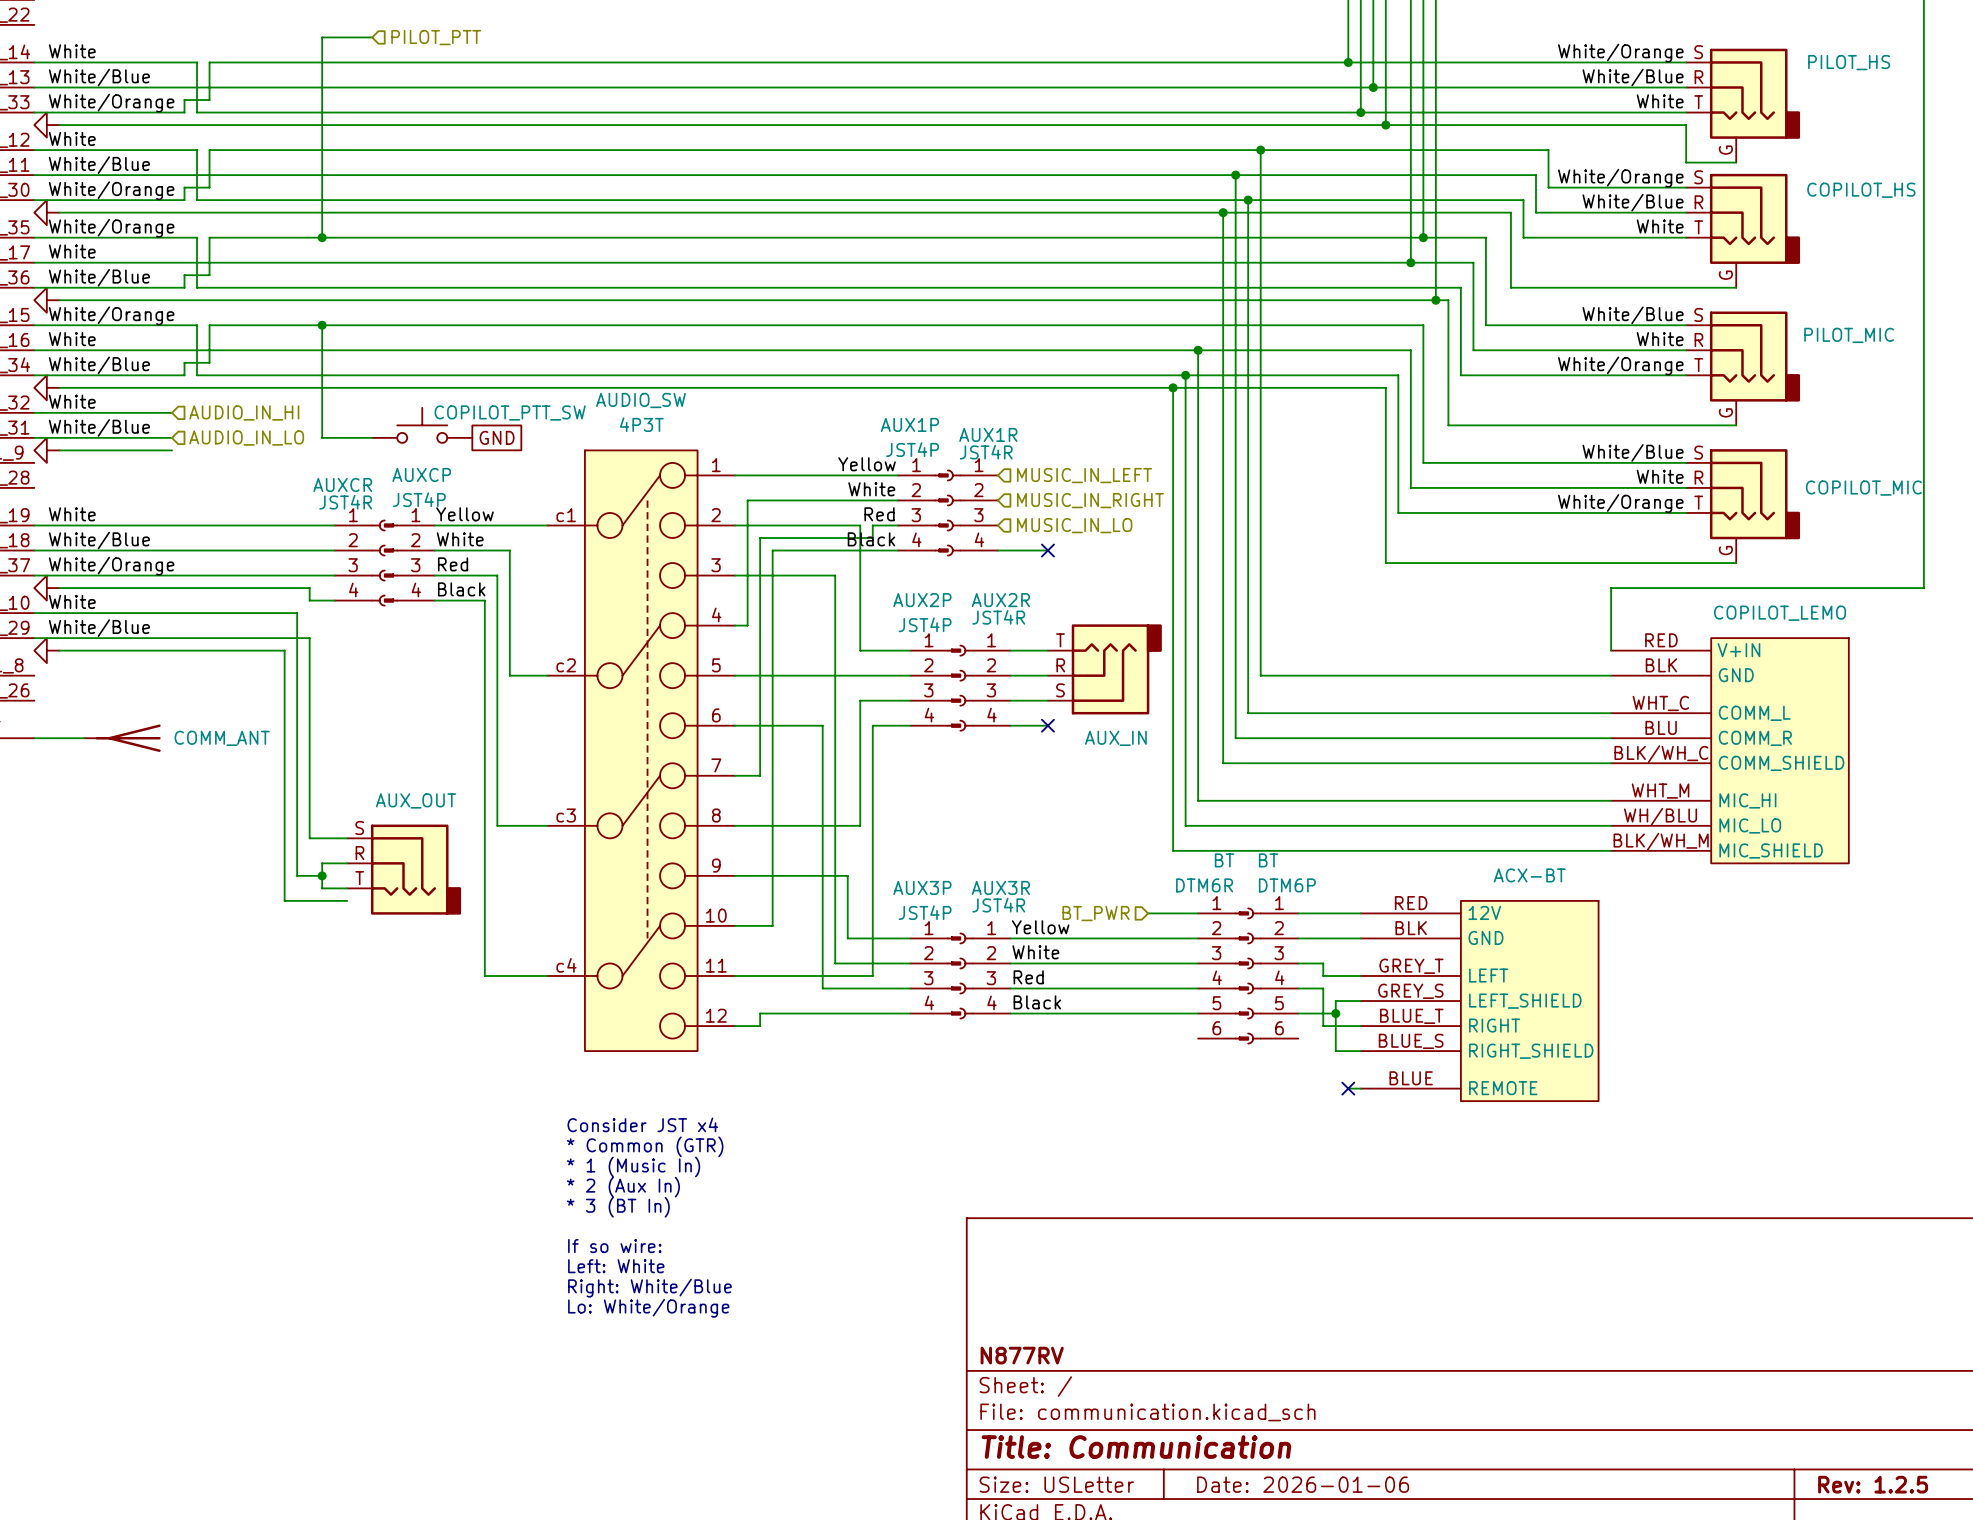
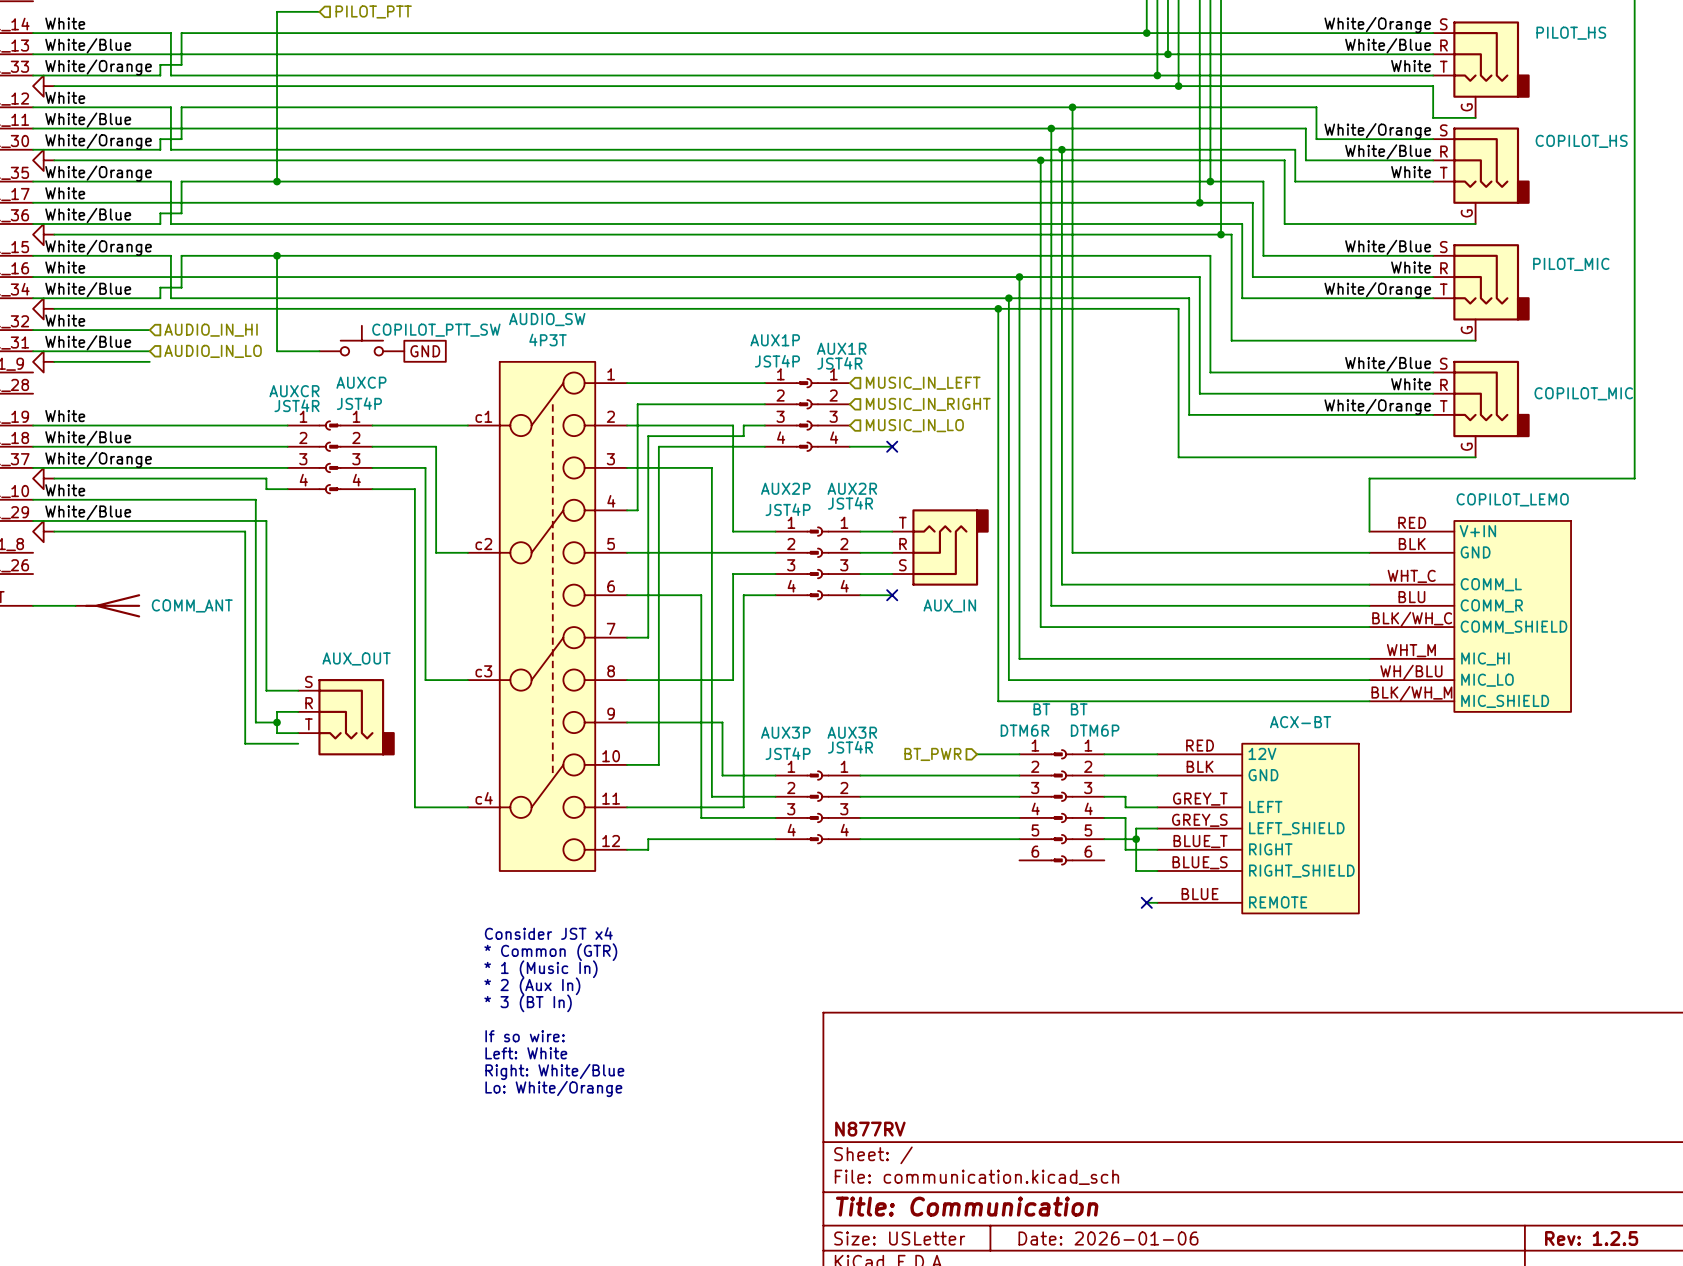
label: Yellow (867, 464) -> none
label: White (871, 489) -> none
label: Yellow (464, 514) -> none
label: Red (879, 514) -> none
label: White (460, 539) -> none
label: Black (871, 539) -> none
label: Red (453, 564) -> none
label: Black (461, 589) -> none
label: Yellow (1040, 927) -> none
label: White (1035, 952) -> none
label: Red (1028, 977) -> none
label: Black (1037, 1002) -> none

